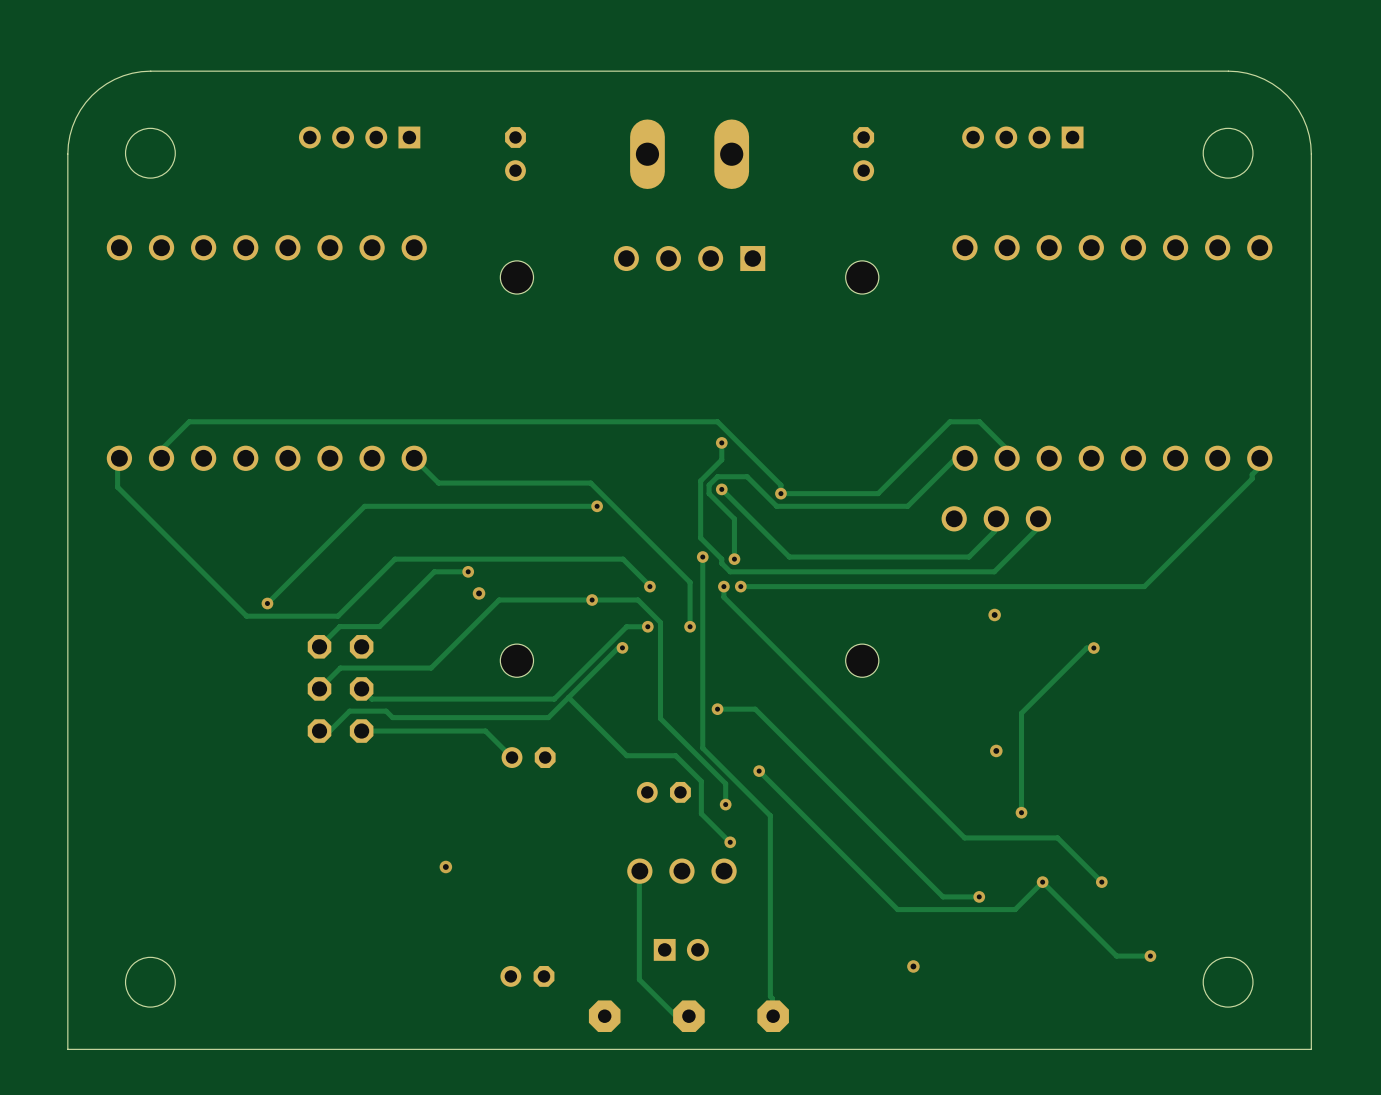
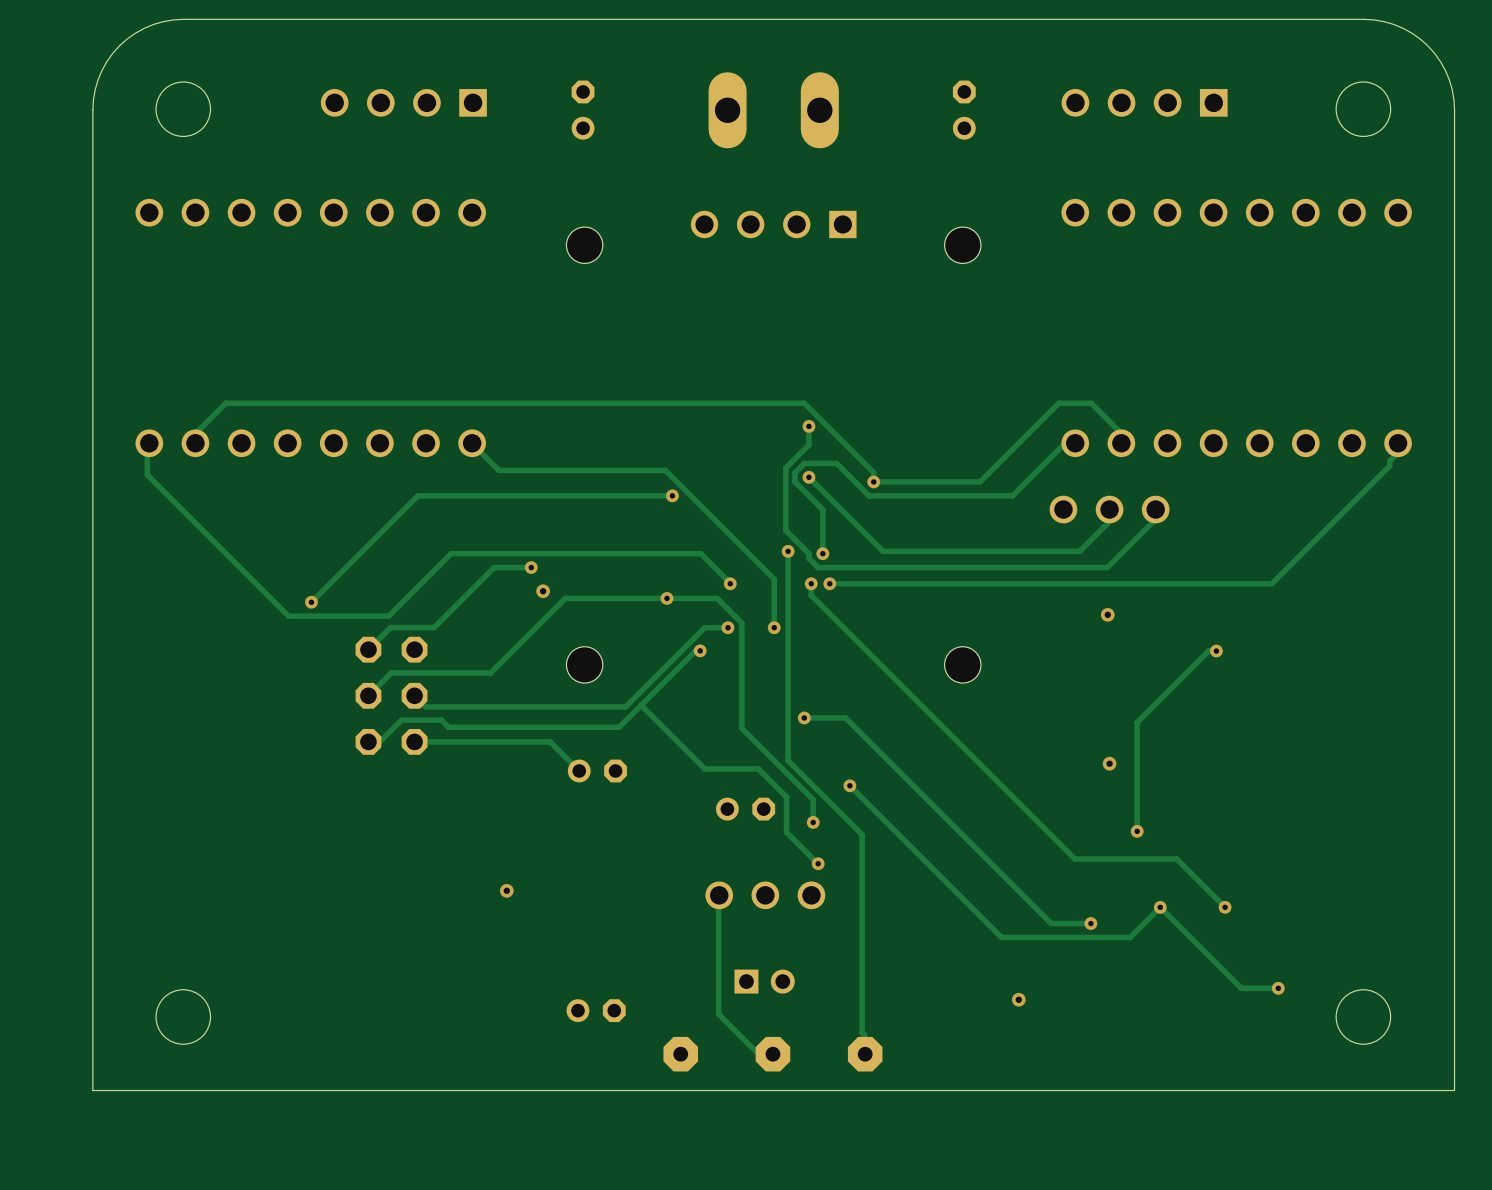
part footprint: [298, 126, 421, 149] -> [320, 89, 487, 117]
part footprint: [962, 126, 1084, 149] -> [1061, 89, 1228, 117]

